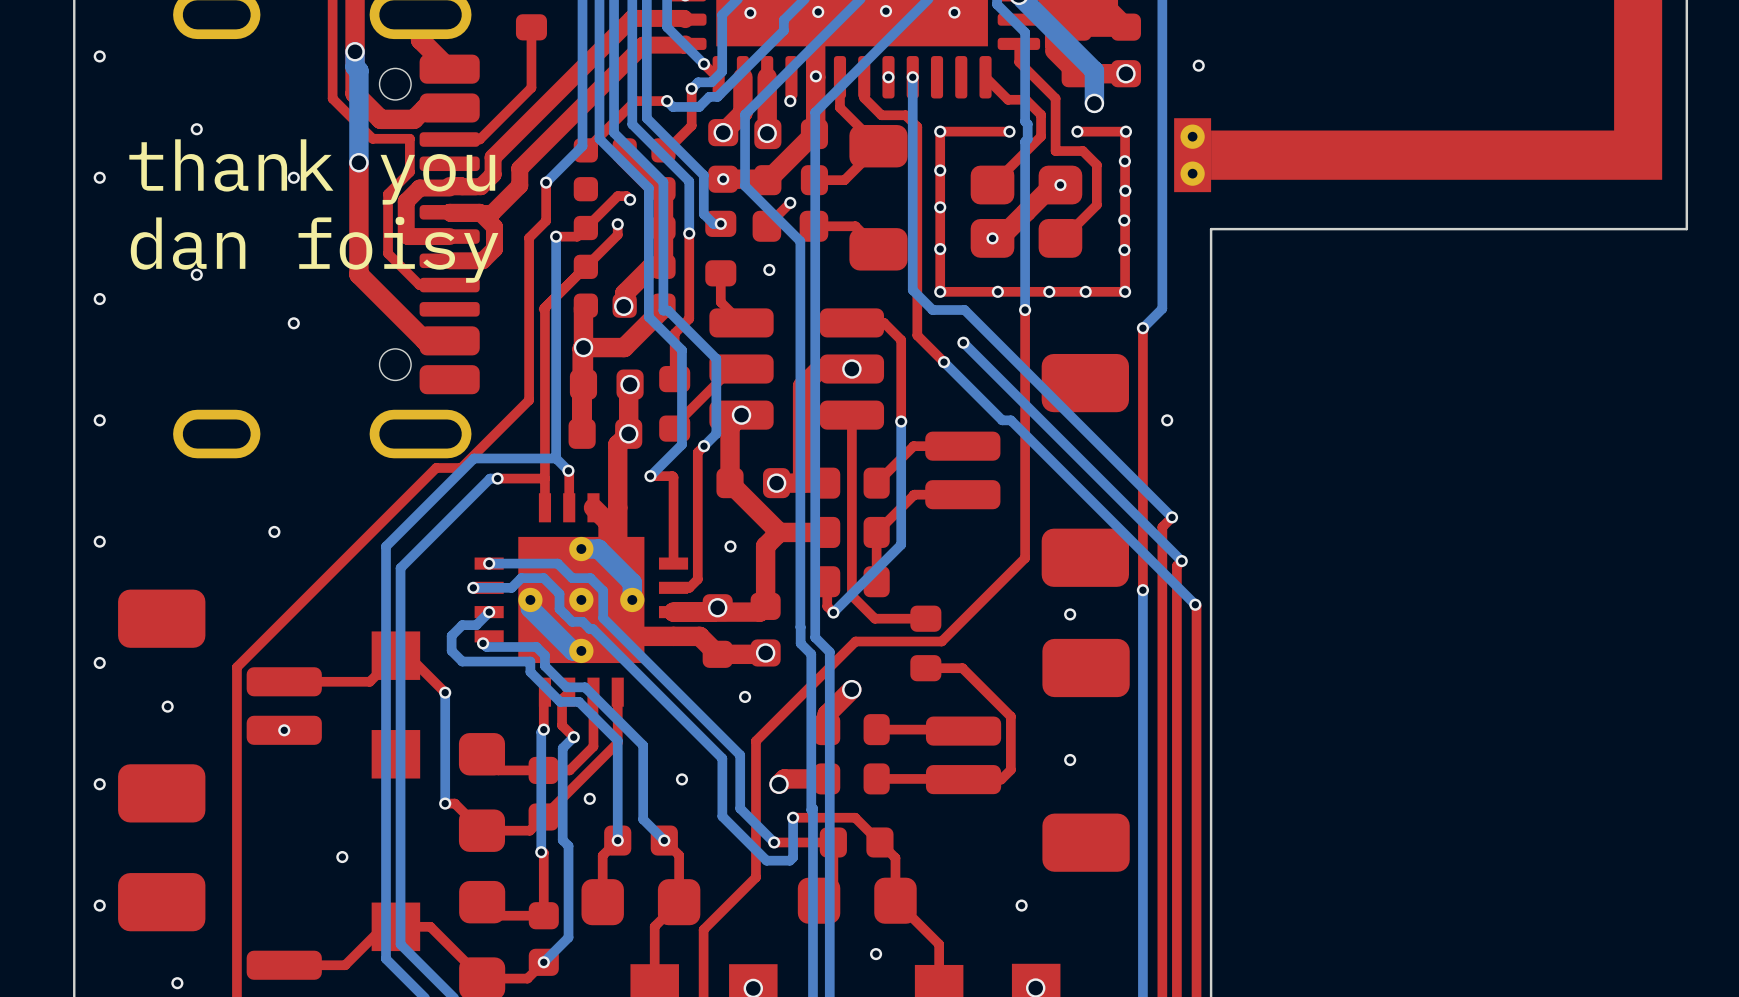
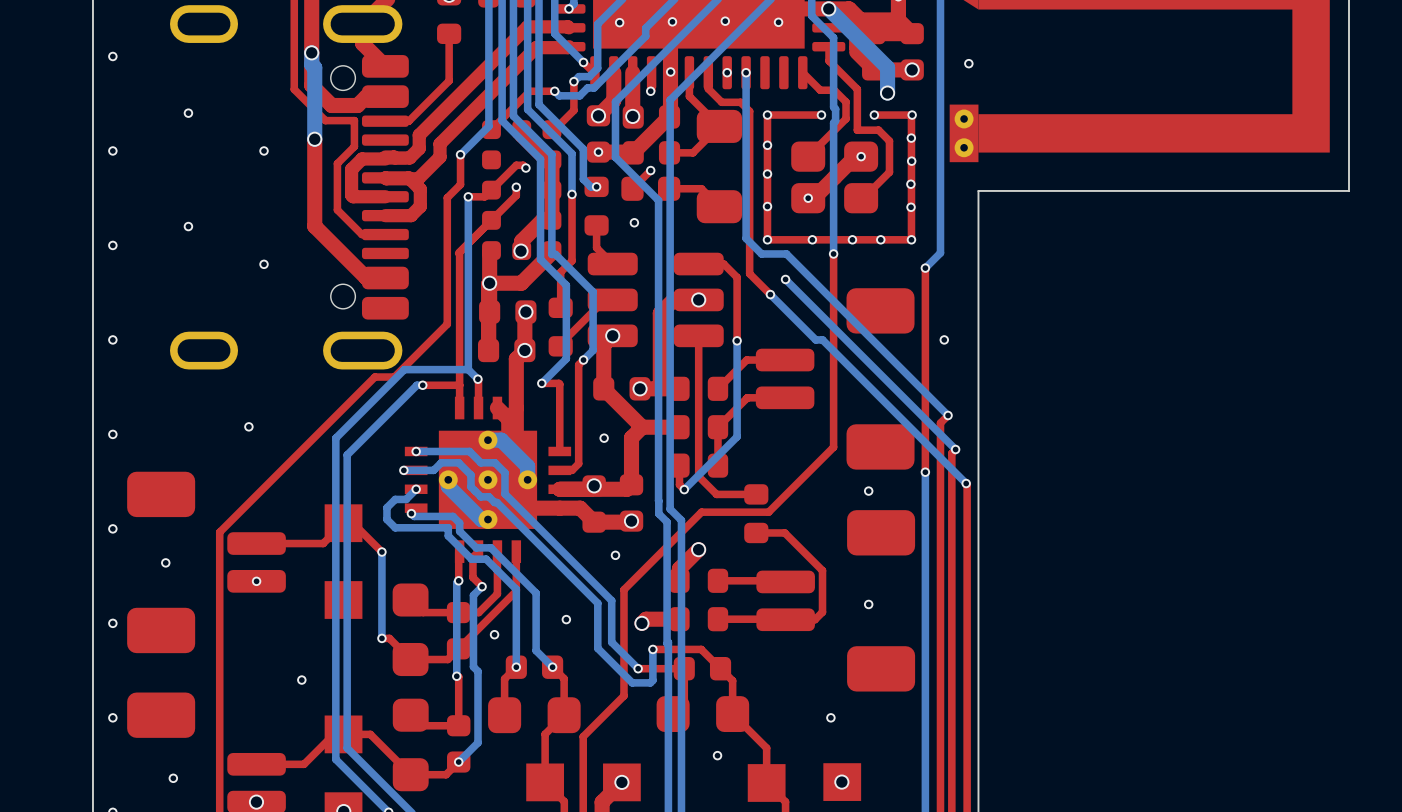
text: thank you (312, 171) -> none
text: dan foisy (314, 249) -> none

